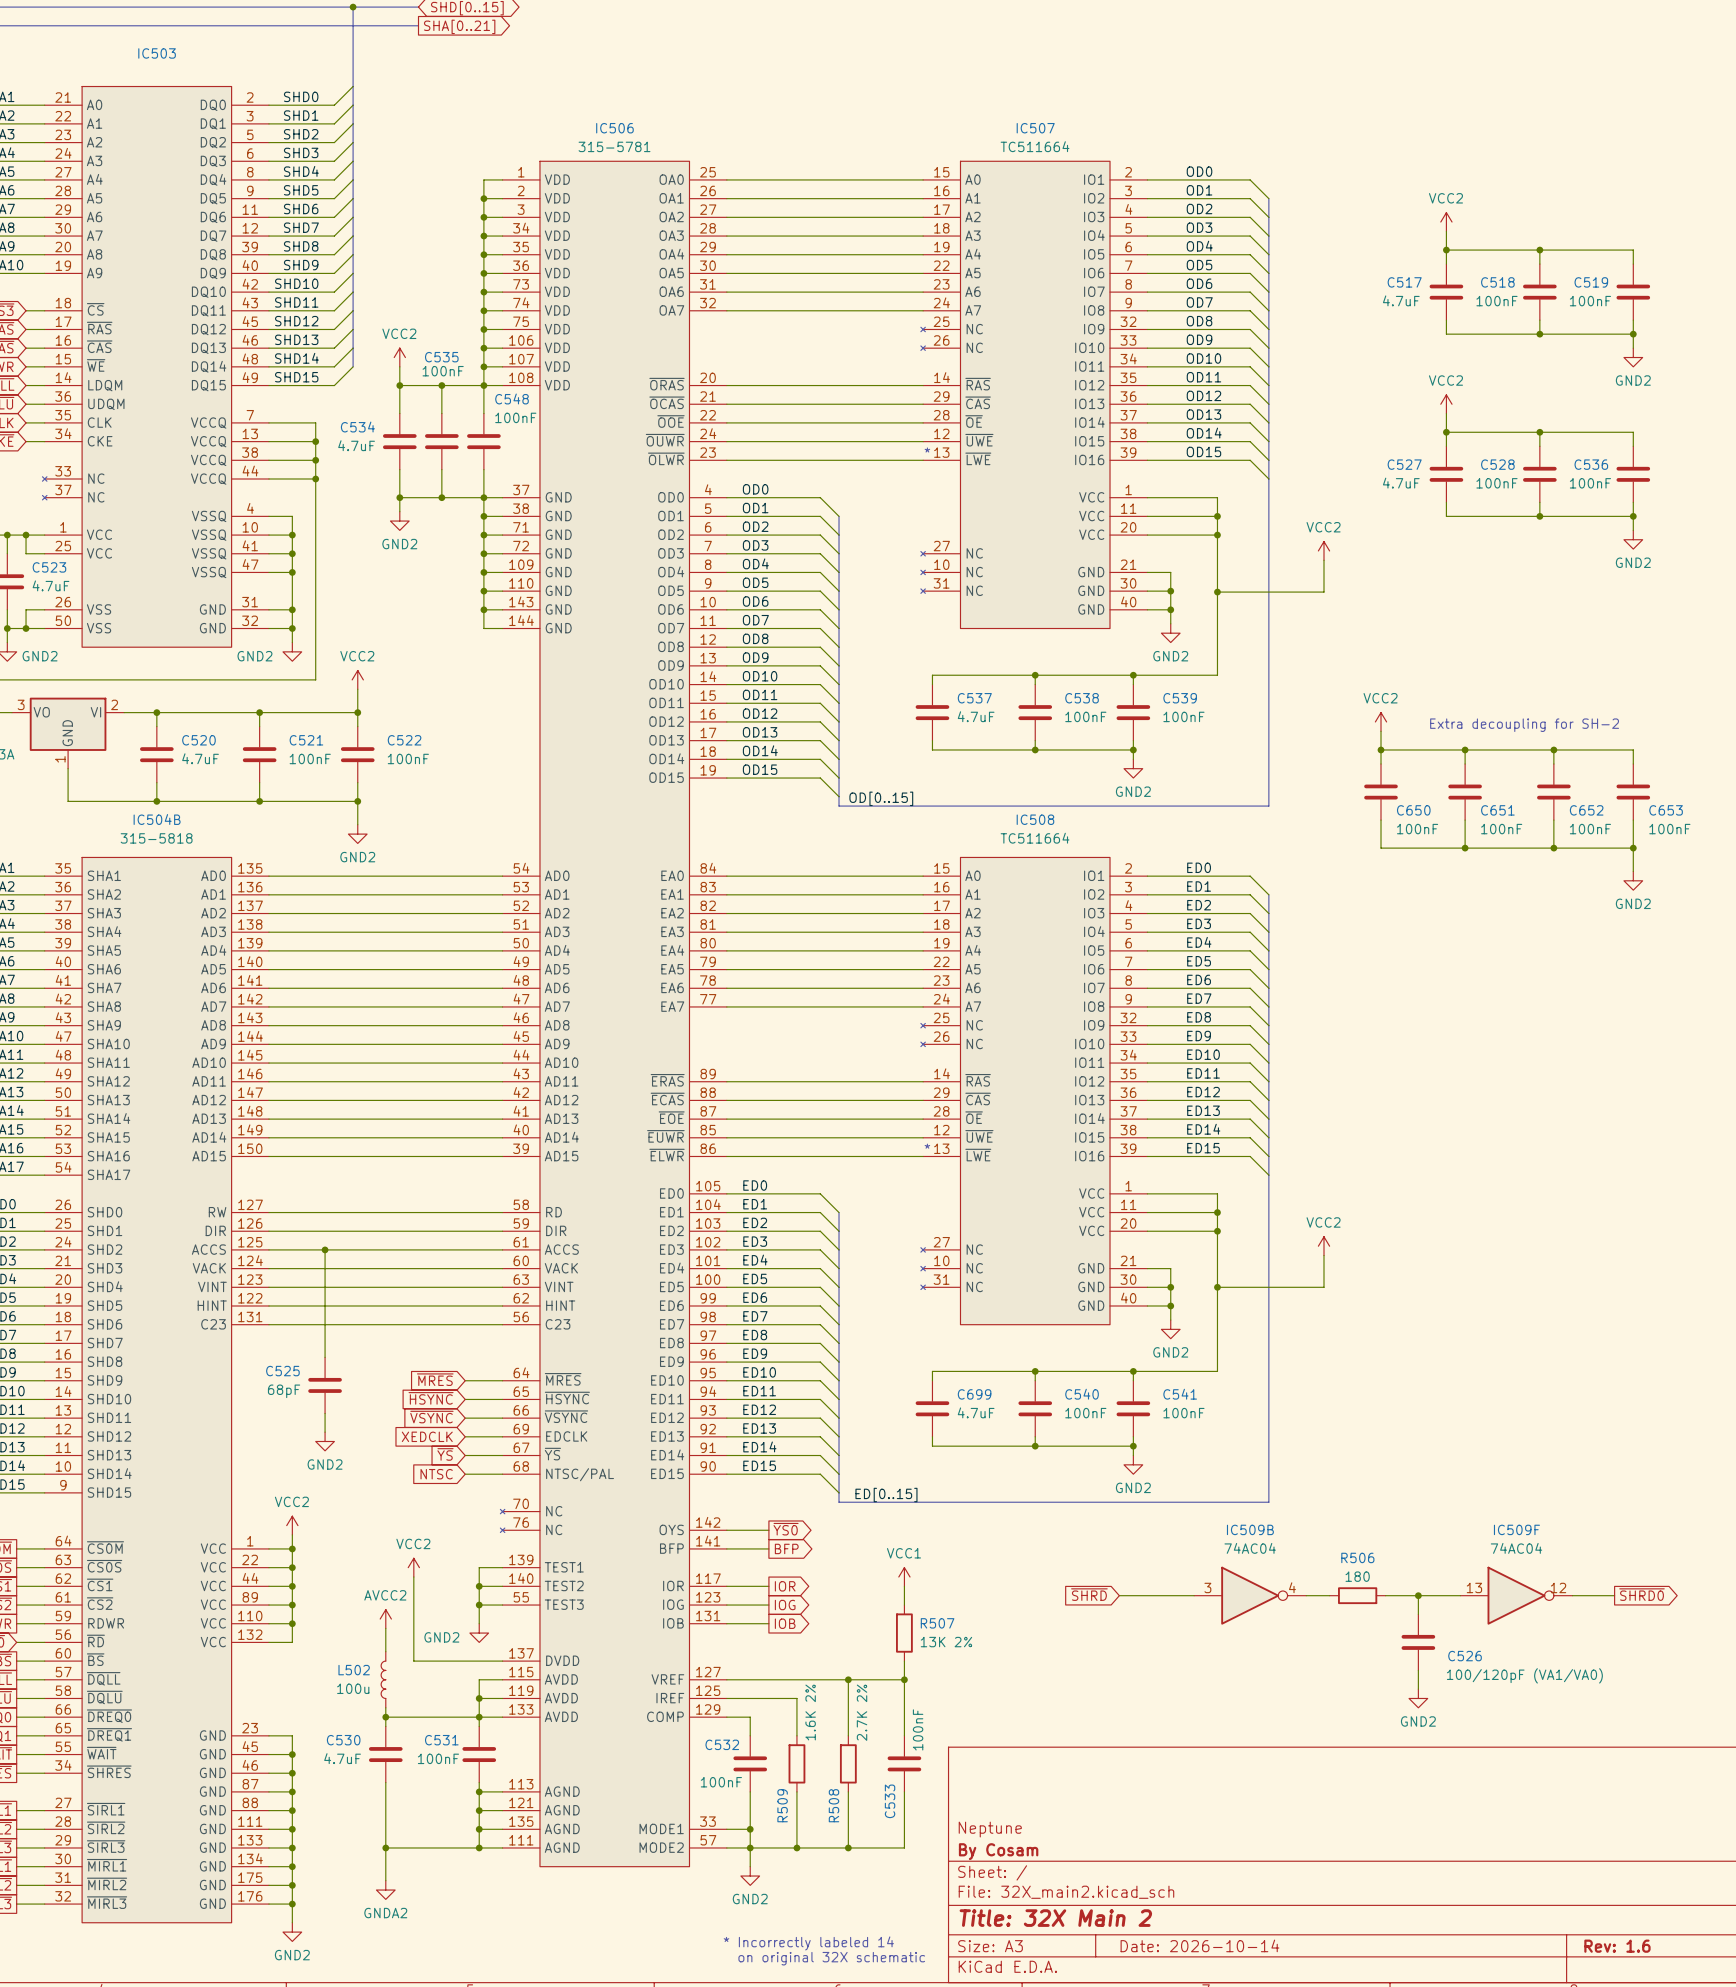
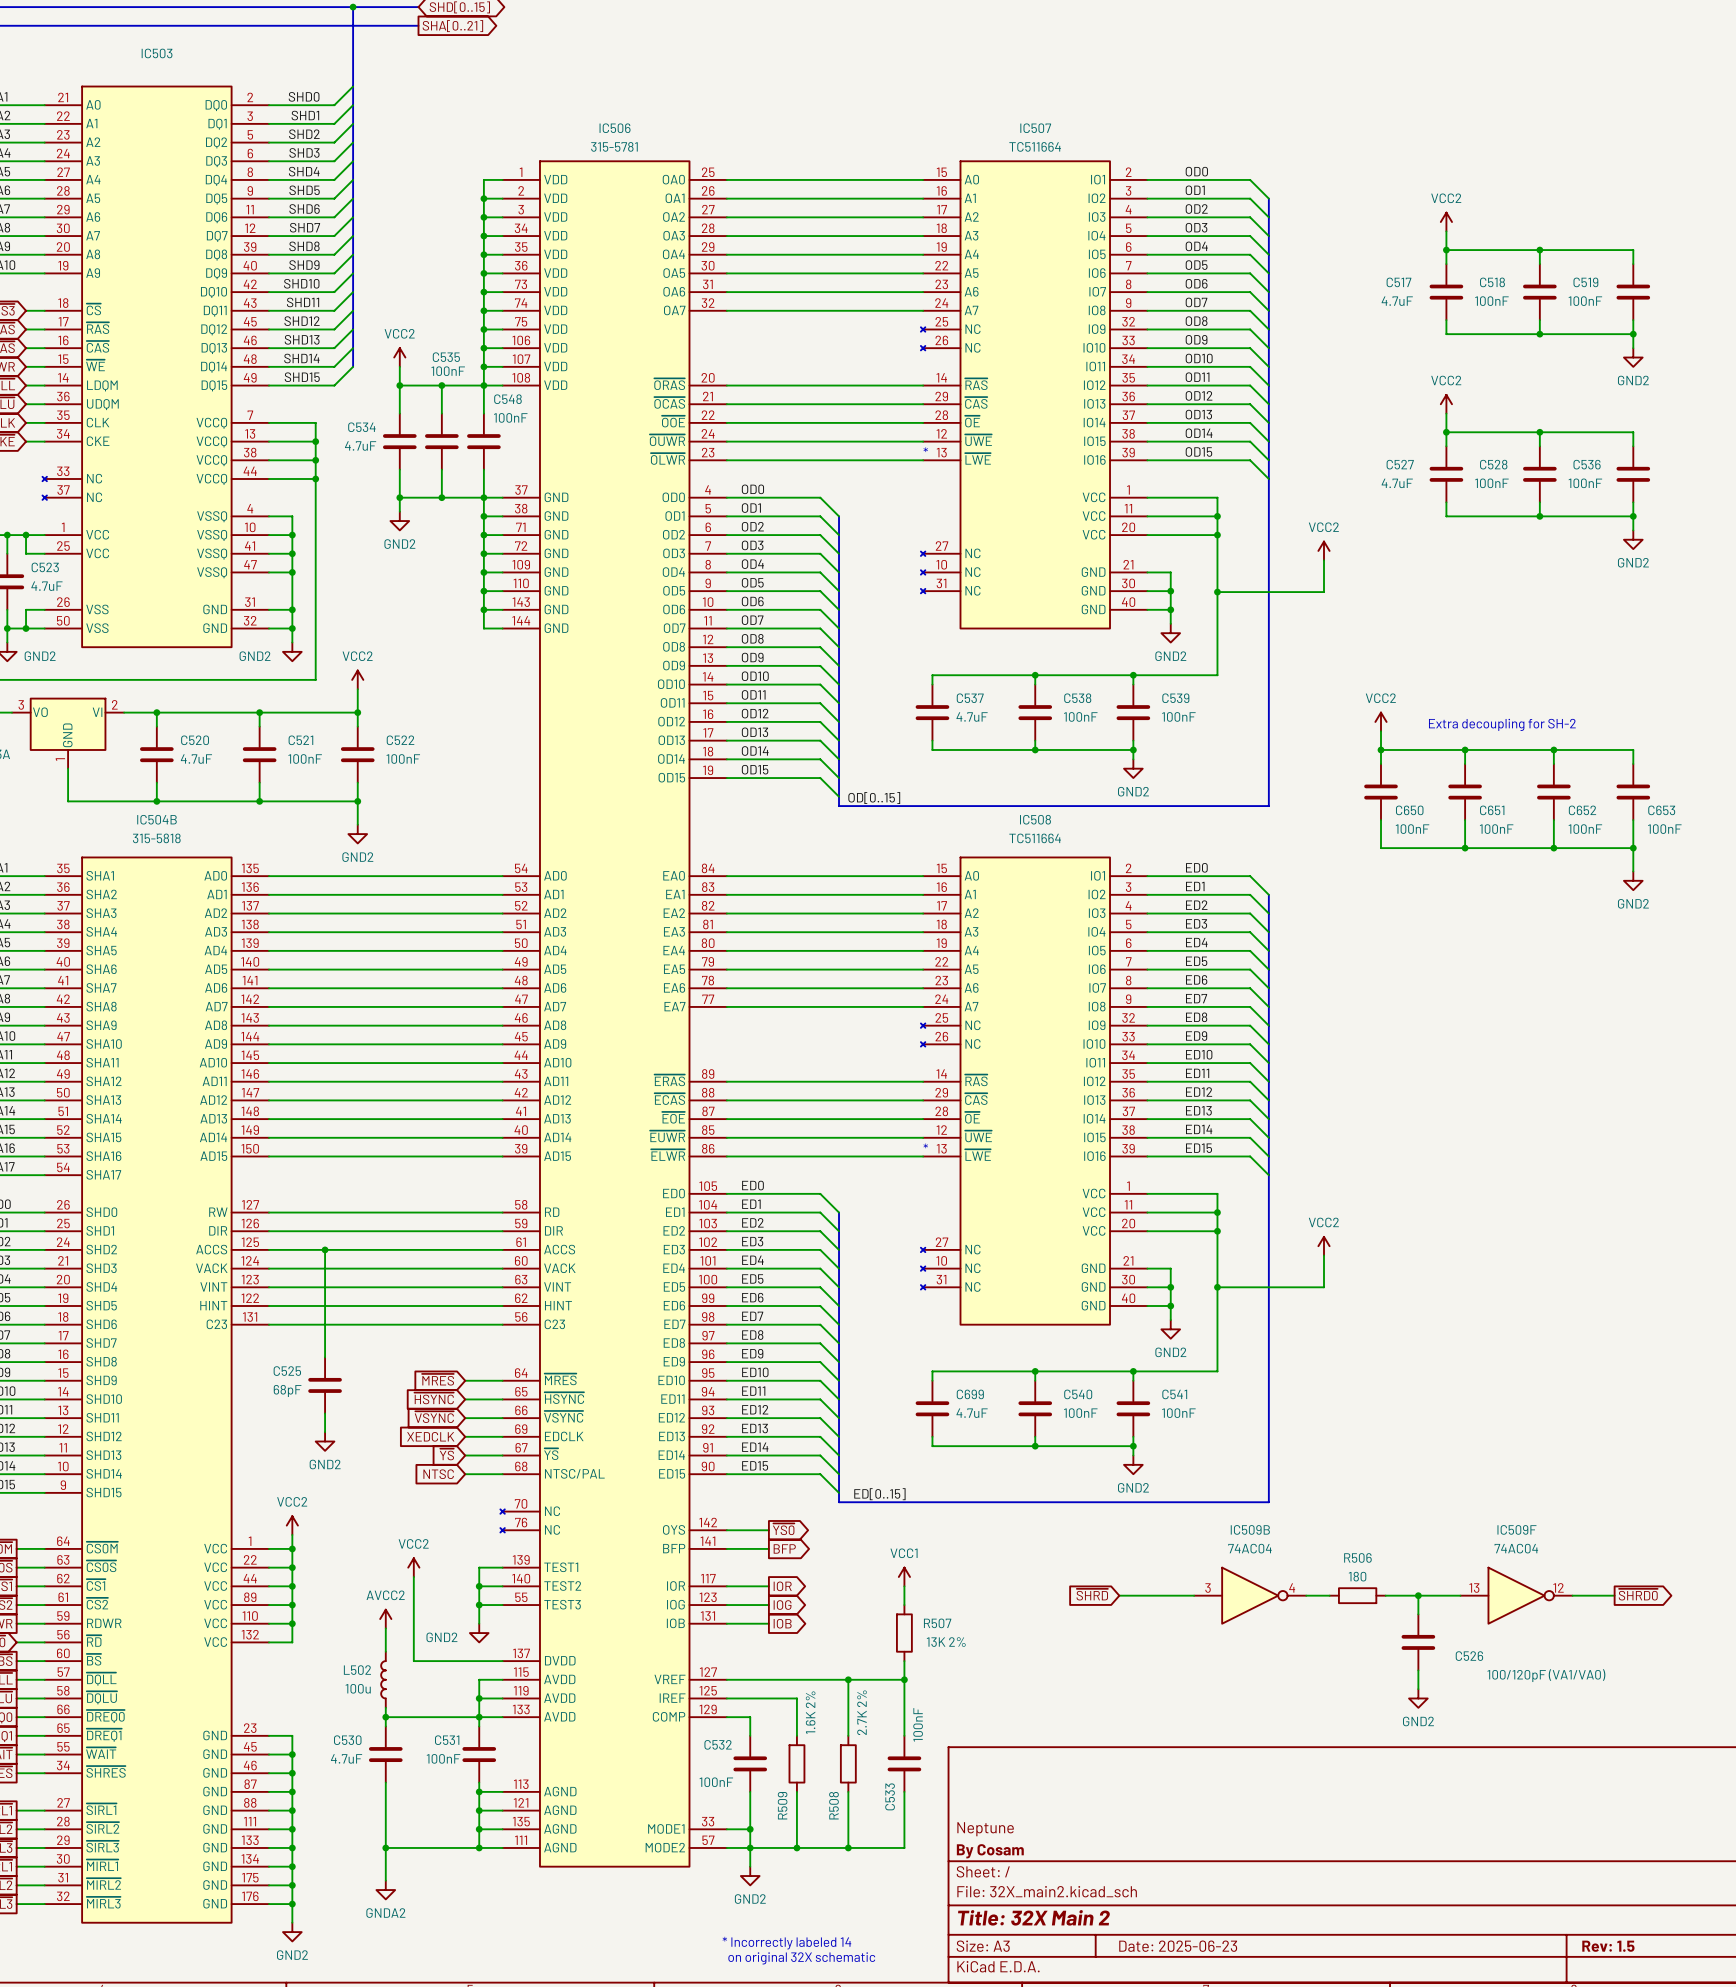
title block: Date: 2026-10-14 (1199, 1945) -> Date: 2025-06-23 (1178, 1946)
title block: Rev: 1.6 (1617, 1946) -> Rev: 1.5 (1608, 1946)

